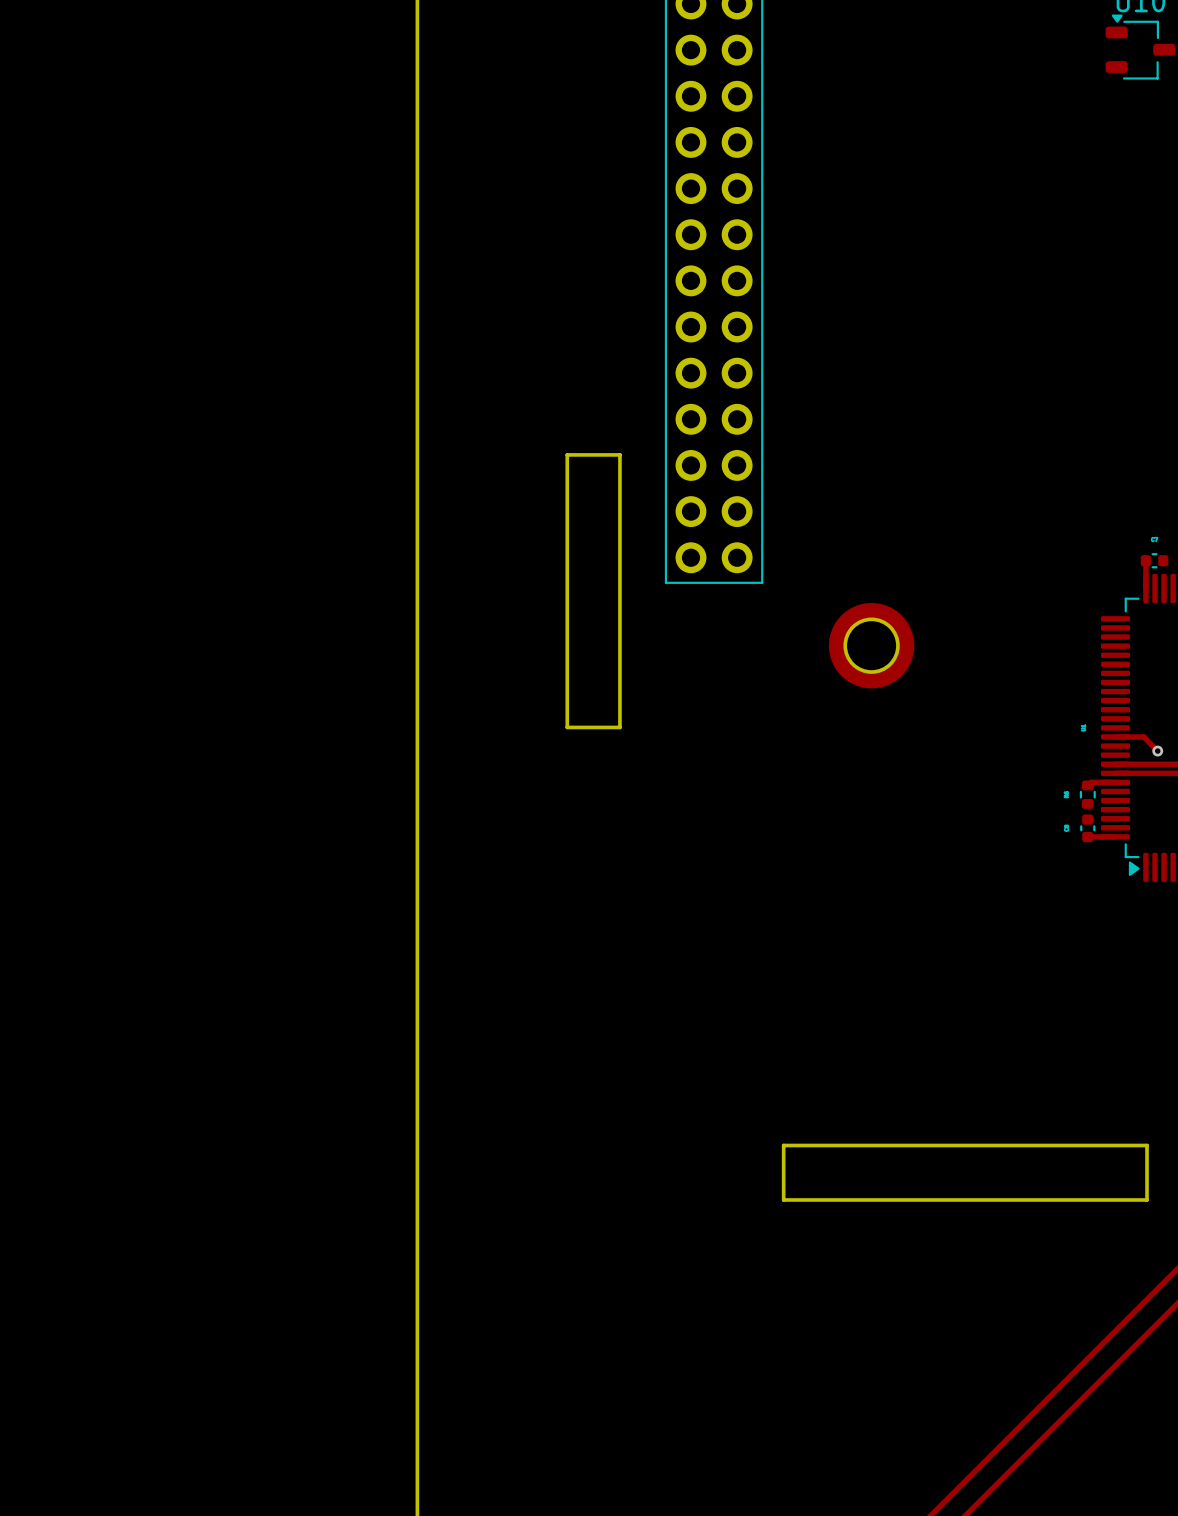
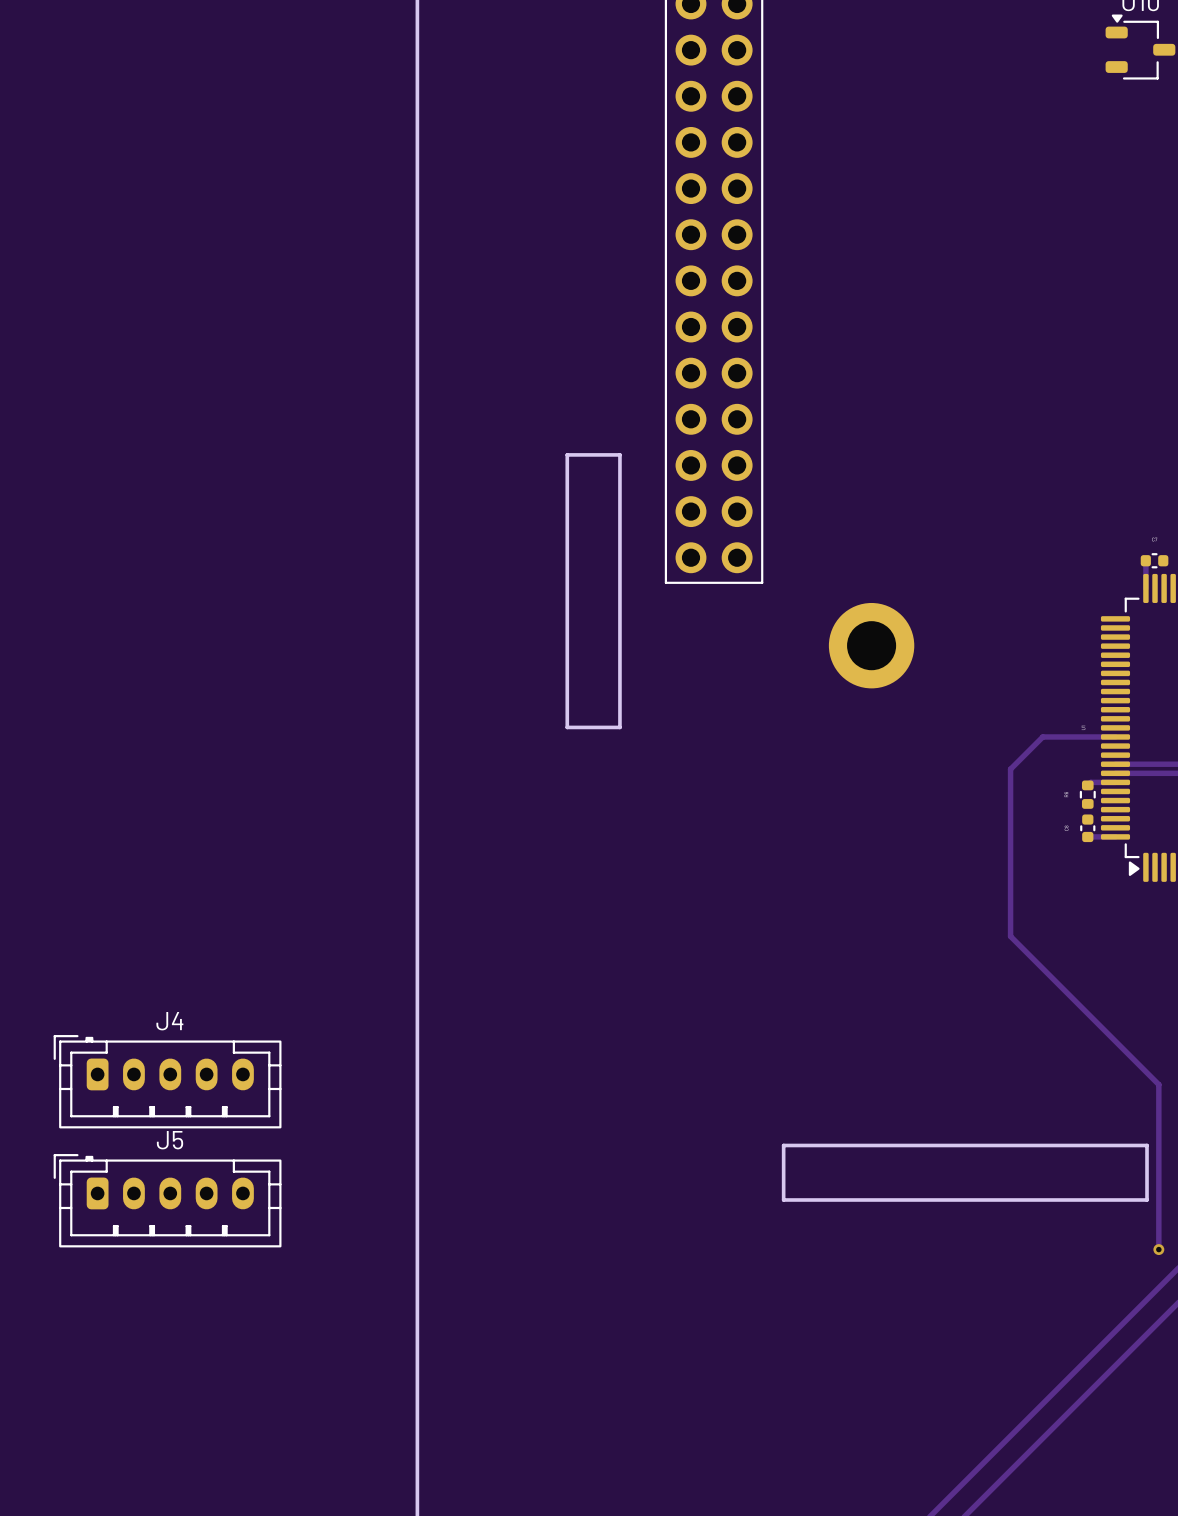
track: (1115, 736) (1143, 736) (1157, 751) -> (1115, 736) (1042, 736) (1010, 769) (1010, 936) (1158, 1084) (1158, 1249)
via: (1157, 751) -> none
J4: none -> (167, 1081)
J5: none -> (167, 1200)
via: none -> (1158, 1249)

